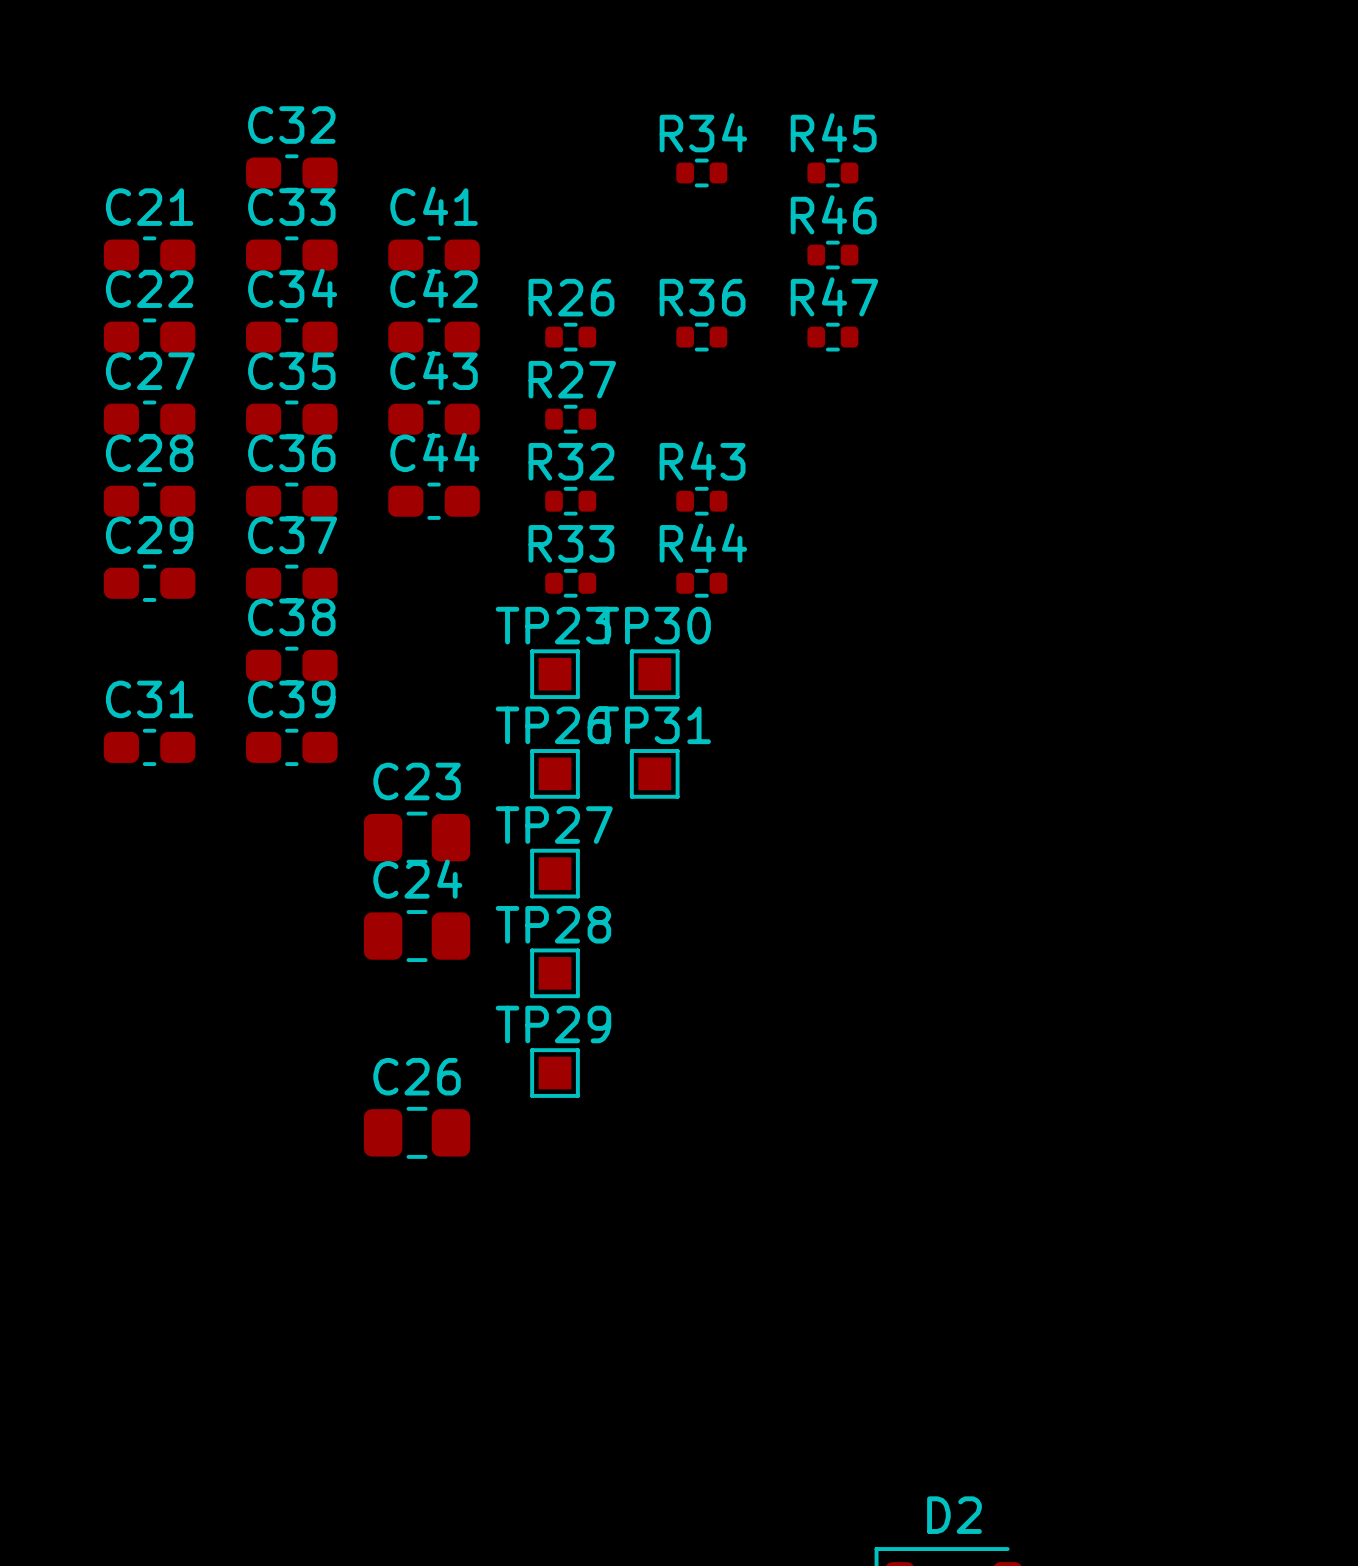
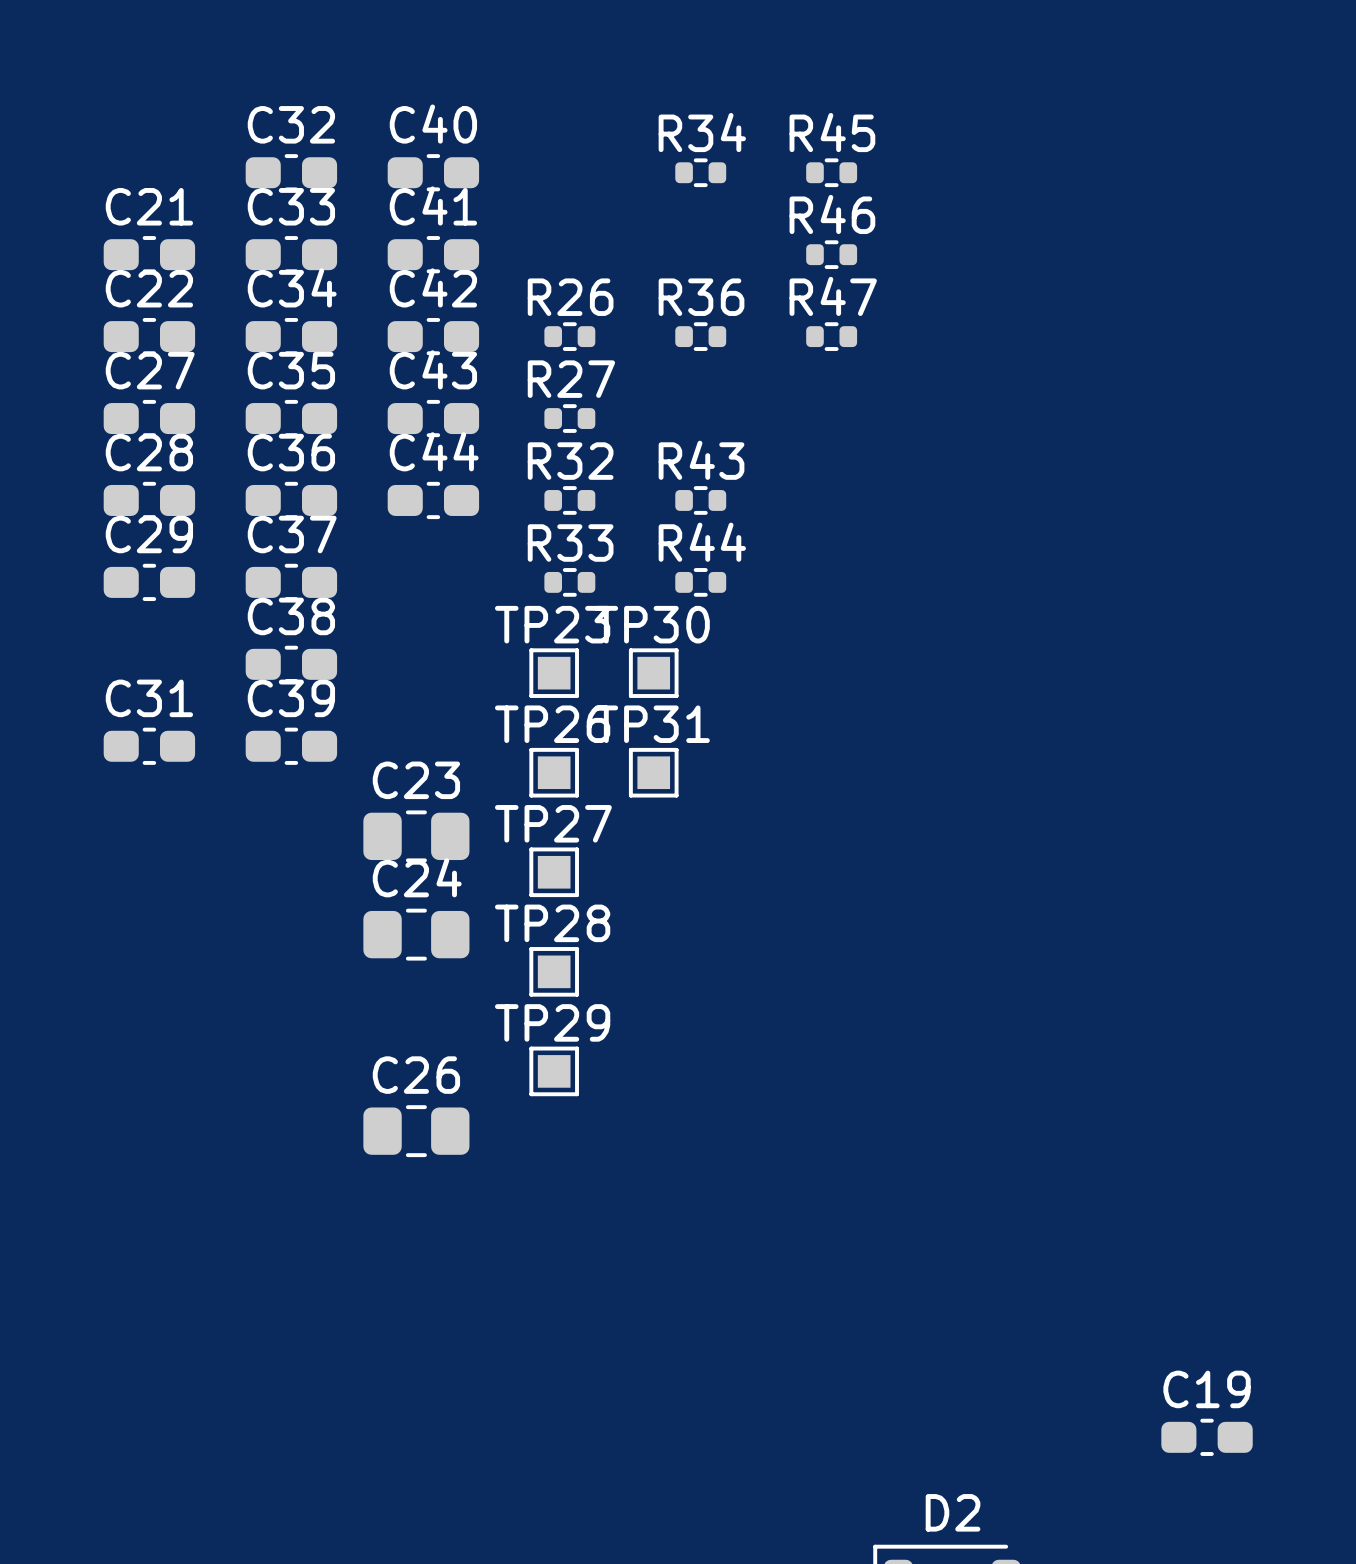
C40: none -> (433, 172)
C19: none -> (1207, 1437)

